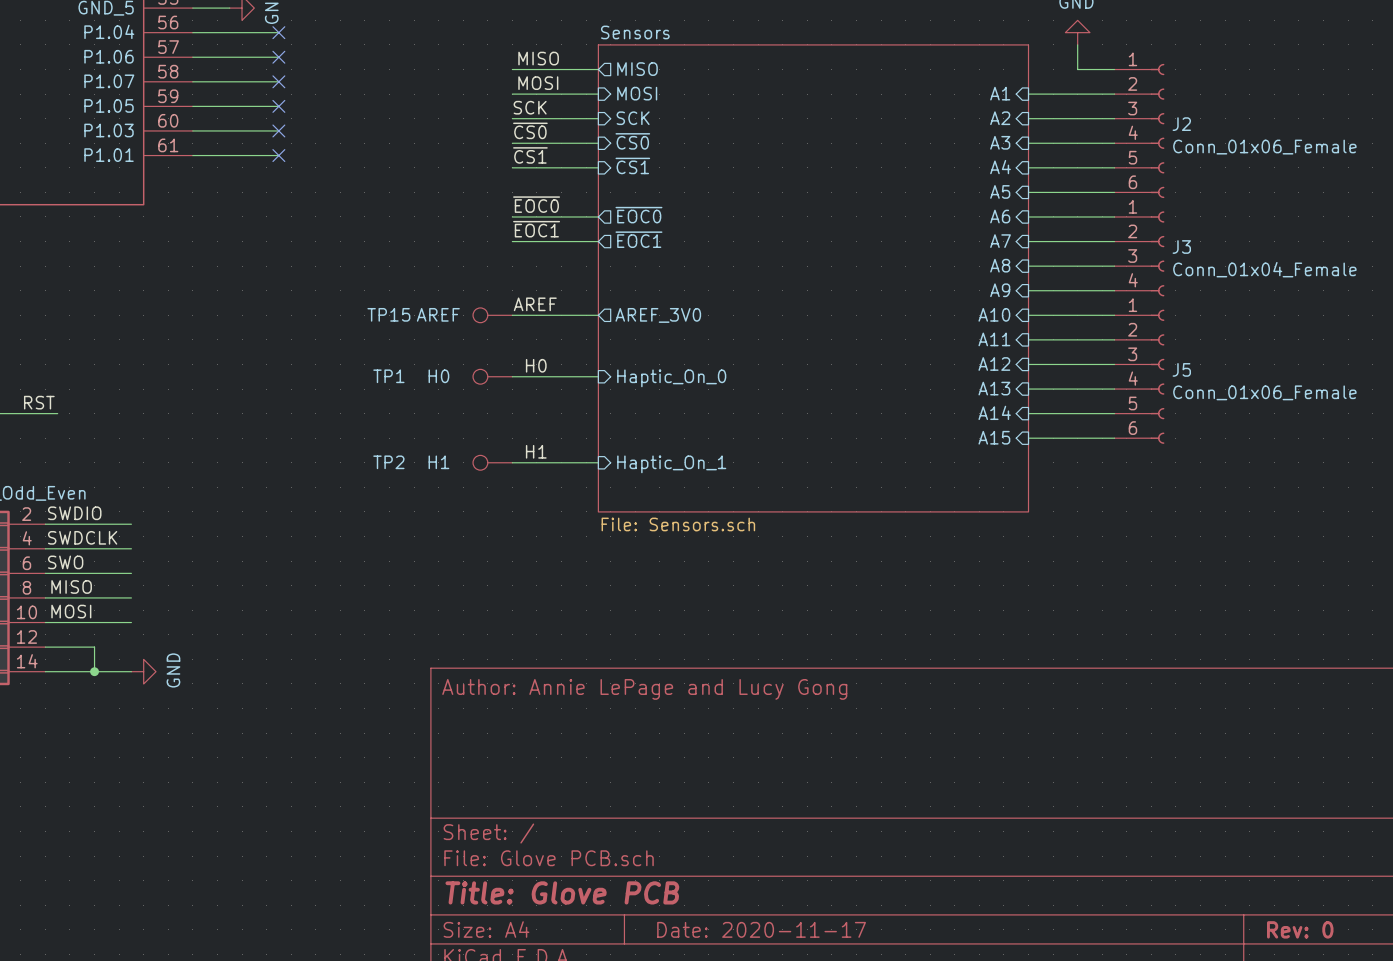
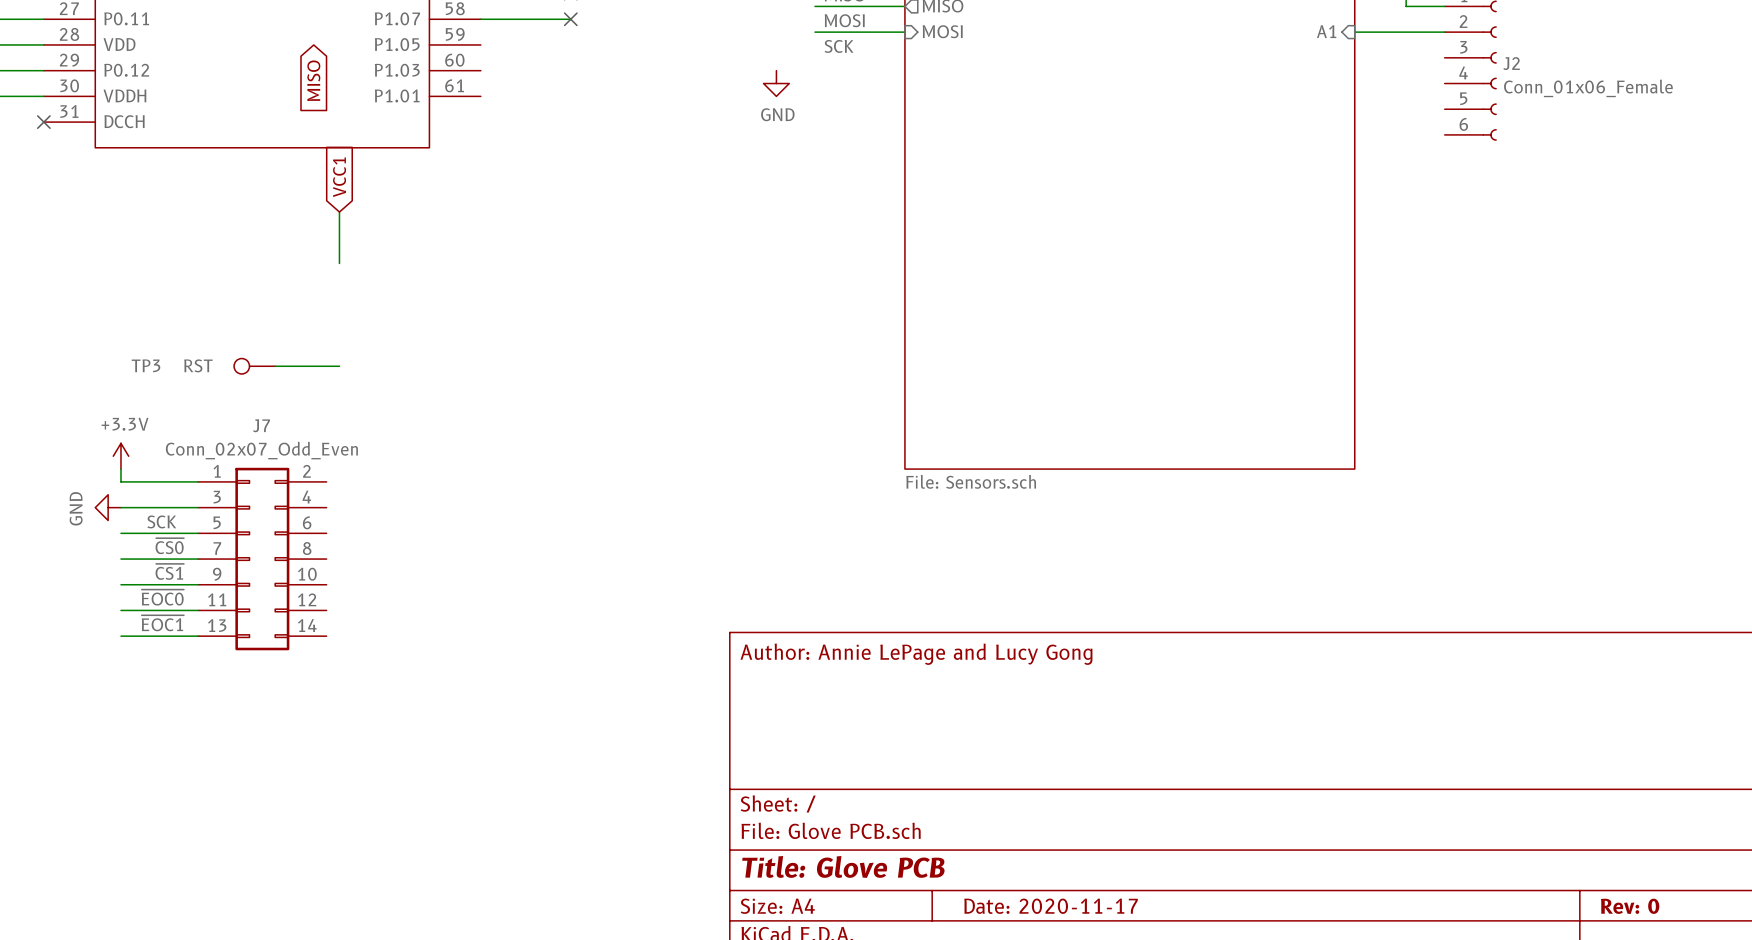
wire: (192, 106) (278, 106) -> none
no-connect mark: (278, 106) -> none
wire: (512, 118) (598, 118) -> none
sheet pin: SCK (633, 118) -> none
sheet pin: A2 (1000, 118) -> none
wire: (1028, 118) (1114, 118) -> none
wire: (192, 130) (278, 130) -> none
no-connect mark: (278, 130) -> none
label: ~{CS0} (530, 130) -> none
sheet pin: ~{CS0} (632, 141) -> none
sheet pin: A3 (1000, 142) -> none
global label: none -> MISO (313, 80)
power symbol: none -> GND (776, 83)
wire: (512, 143) (598, 143) -> none
wire: (1028, 143) (1114, 143) -> none
wire: (192, 155) (278, 155) -> none
no-connect mark: (278, 155) -> none
label: ~{CS1} (530, 155) -> none
sheet pin: ~{CS1} (632, 165) -> none
wire: (512, 167) (598, 167) -> none
sheet pin: A4 (1000, 167) -> none
wire: (1028, 167) (1114, 167) -> none
sheet pin: A5 (1000, 191) -> none
wire: (1028, 192) (1114, 192) -> none
label: ~{EOC0} (536, 204) -> none
sheet pin: ~{EOC0} (638, 215) -> none
wire: (512, 216) (598, 216) -> none
sheet pin: A6 (1000, 216) -> none
wire: (1028, 216) (1114, 216) -> none
global label: none -> VCC1 (339, 177)
label: ~{EOC1} (536, 229) -> none
sheet pin: ~{EOC1} (638, 239) -> none
wire: (512, 241) (598, 241) -> none
sheet pin: A7 (1000, 241) -> none
wire: (1028, 241) (1114, 241) -> none
J3: Conn_01x04_Female (1139, 253) -> none
sheet pin: A8 (1000, 265) -> none
wire: none -> (339, 212) (339, 263)
wire: (1028, 266) (1114, 266) -> none
sheet pin: A9 (1000, 290) -> none
wire: (1028, 290) (1114, 290) -> none
label: AREF (535, 304) -> none
sheet pin: A10 (994, 314) -> none
TP15: AREF (492, 315) -> none
wire: (512, 315) (598, 315) -> none
sheet pin: AREF_3V0 (658, 315) -> none
wire: (1028, 315) (1114, 315) -> none
sheet pin: A11 (994, 339) -> none
wire: (1028, 339) (1114, 339) -> none
sheet pin: A12 (994, 364) -> none
wire: (1028, 364) (1114, 364) -> none
label: H0 (536, 365) -> none
TP1: H0 (492, 376) -> none
wire: (512, 376) (598, 376) -> none
J5: Conn_01x06_Female (1139, 376) -> none
sheet pin: Haptic_On_0 (671, 378) -> none
sheet pin: A13 (994, 388) -> none
wire: (1028, 389) (1114, 389) -> none
label: RST (39, 402) -> none
sheet pin: A14 (994, 412) -> none
wire: (1028, 413) (1114, 413) -> none
sheet pin: A15 (994, 437) -> none
wire: (1028, 438) (1114, 438) -> none
label: H1 (536, 451) -> none
TP2: H1 (492, 462) -> none
wire: (512, 462) (598, 462) -> none
sheet pin: Haptic_On_1 (671, 464) -> none
label: SWDIO (74, 513) -> none
wire: (45, 524) (131, 524) -> none
label: SWDCLK (82, 537) -> none
wire: (45, 548) (131, 548) -> none
label: SWO (65, 562) -> none
wire: (45, 573) (131, 573) -> none
label: MISO (71, 586) -> none
wire: (45, 597) (131, 597) -> none
label: MOSI (71, 611) -> none
wire: (45, 622) (131, 622) -> none
wire: (45, 647) (94, 647) (94, 671) -> none
wire: (45, 671) (131, 671) -> none
junction: (94, 671) -> none
power symbol: GND (143, 671) -> none

